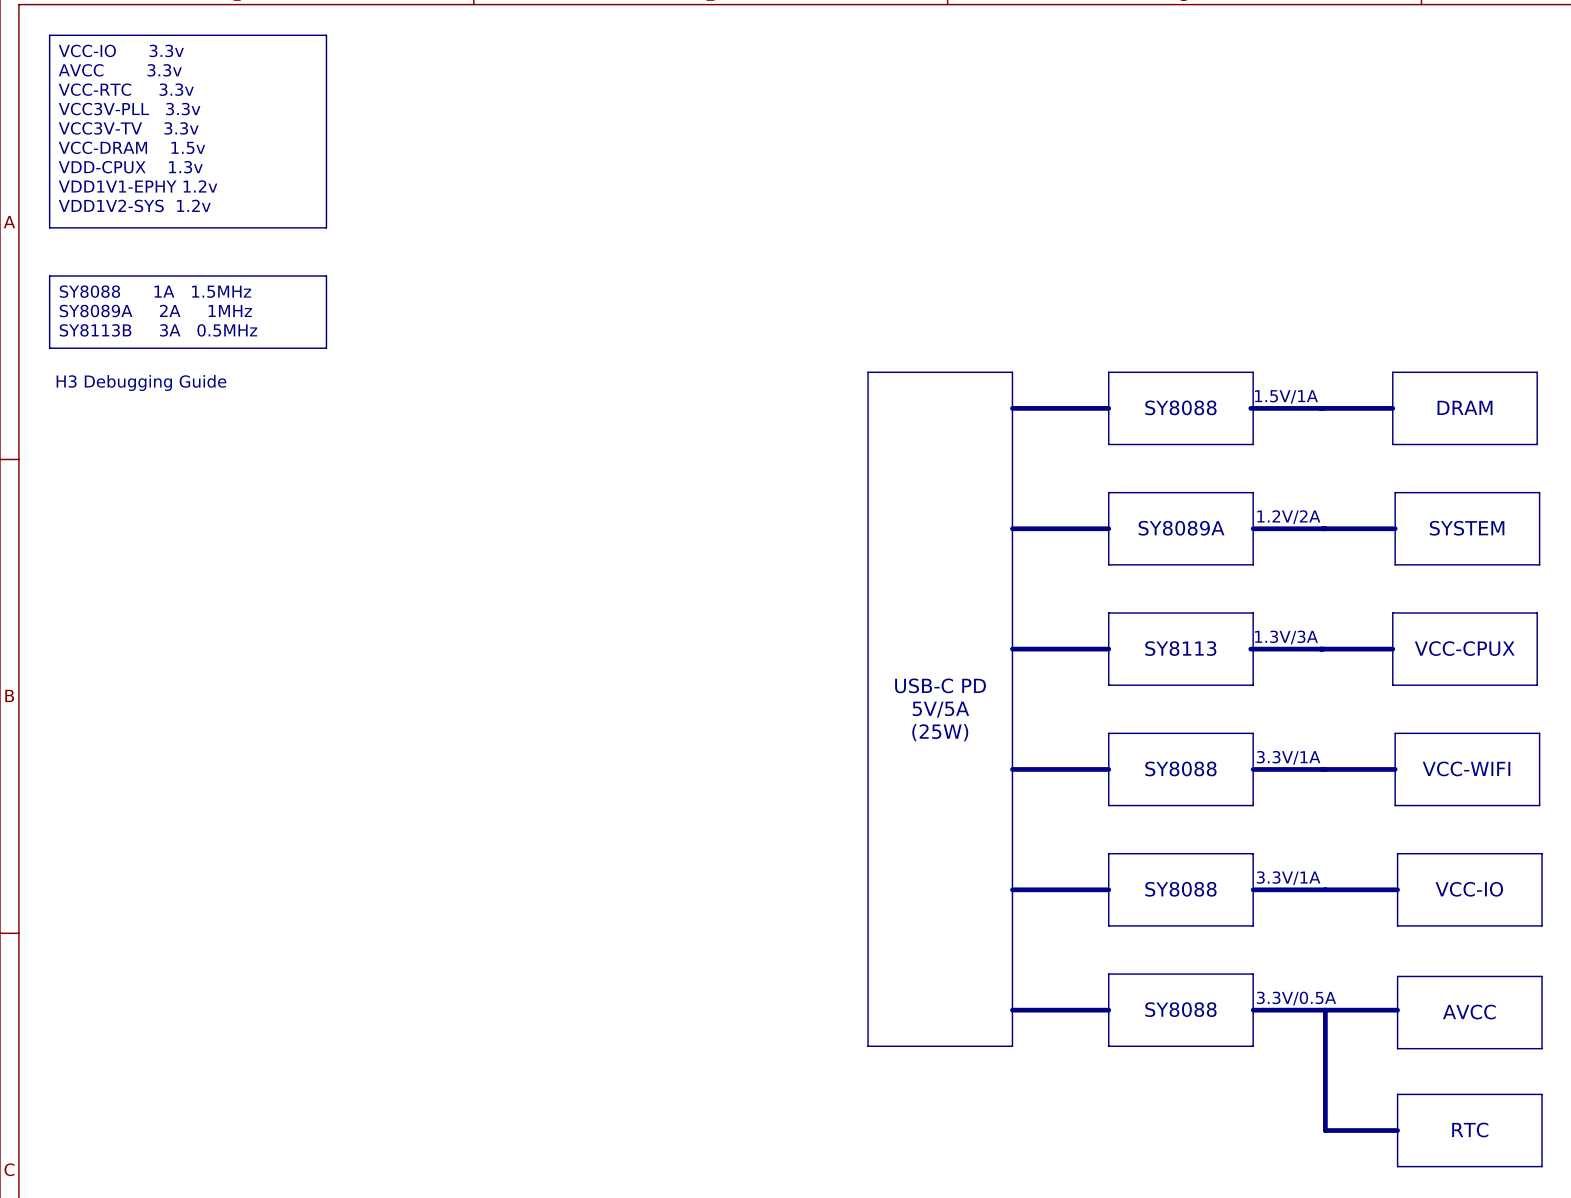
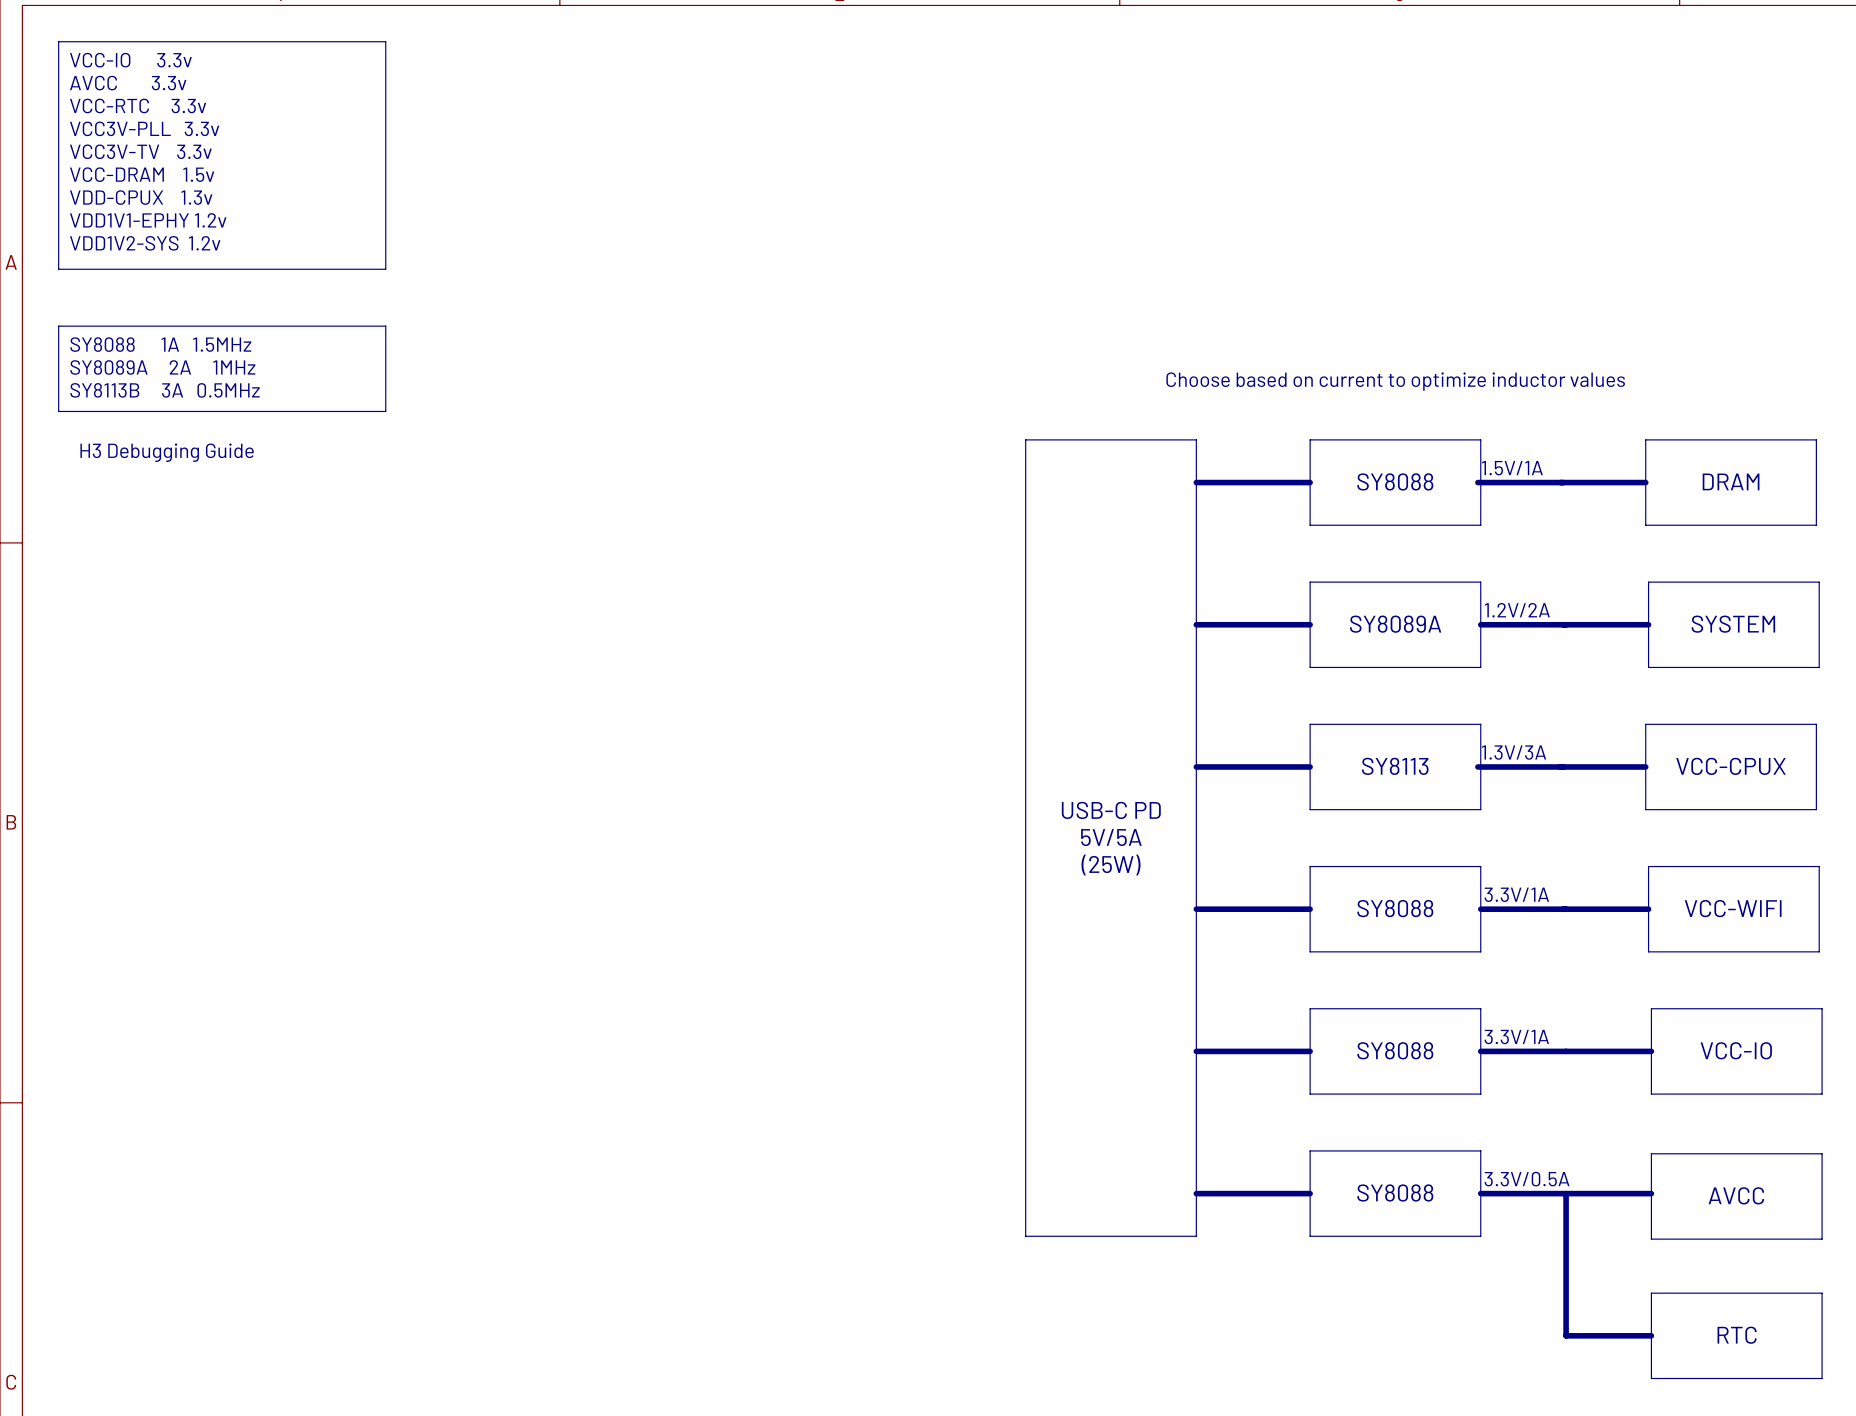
text: none -> Choose based on current to optimize inductor values (1395, 381)

